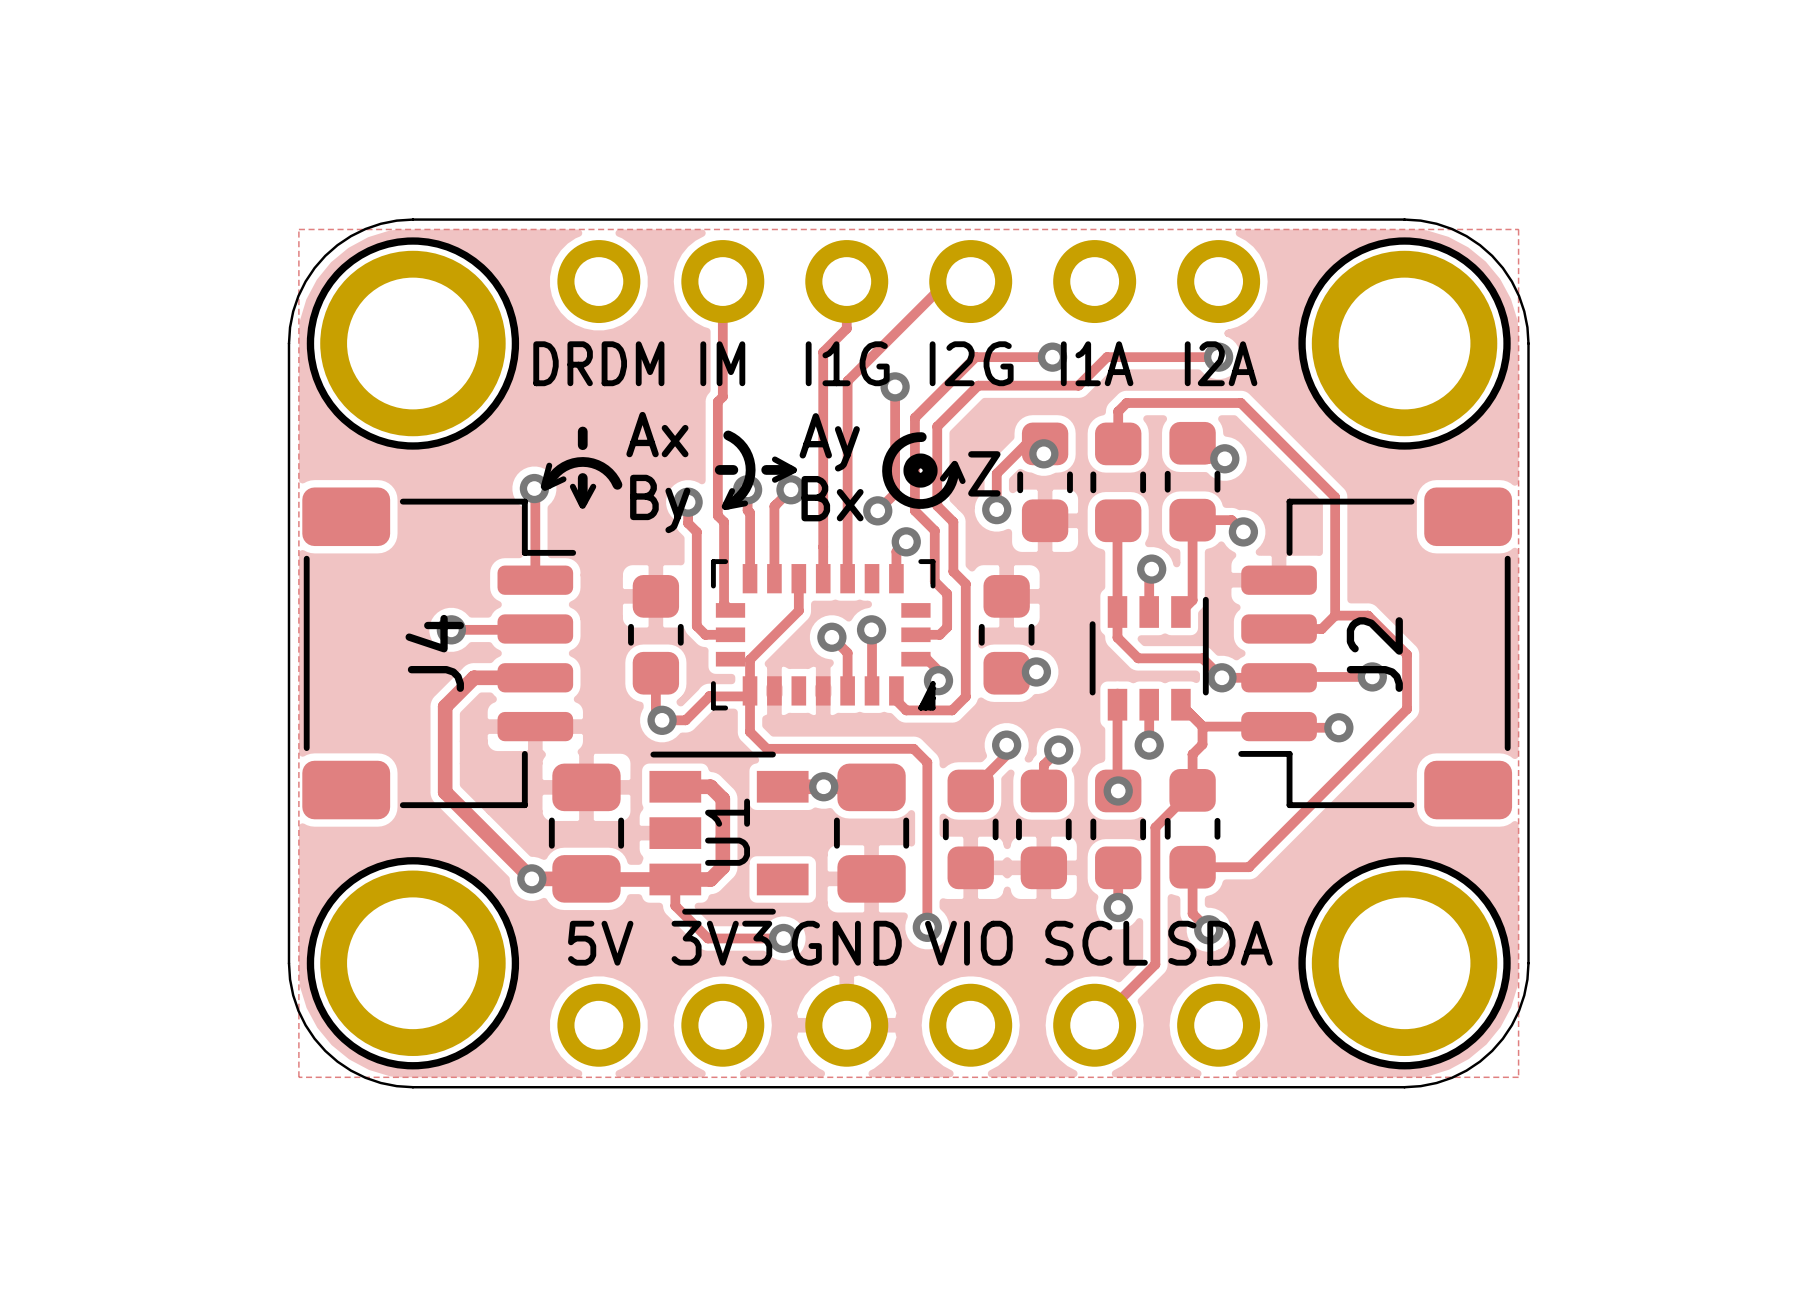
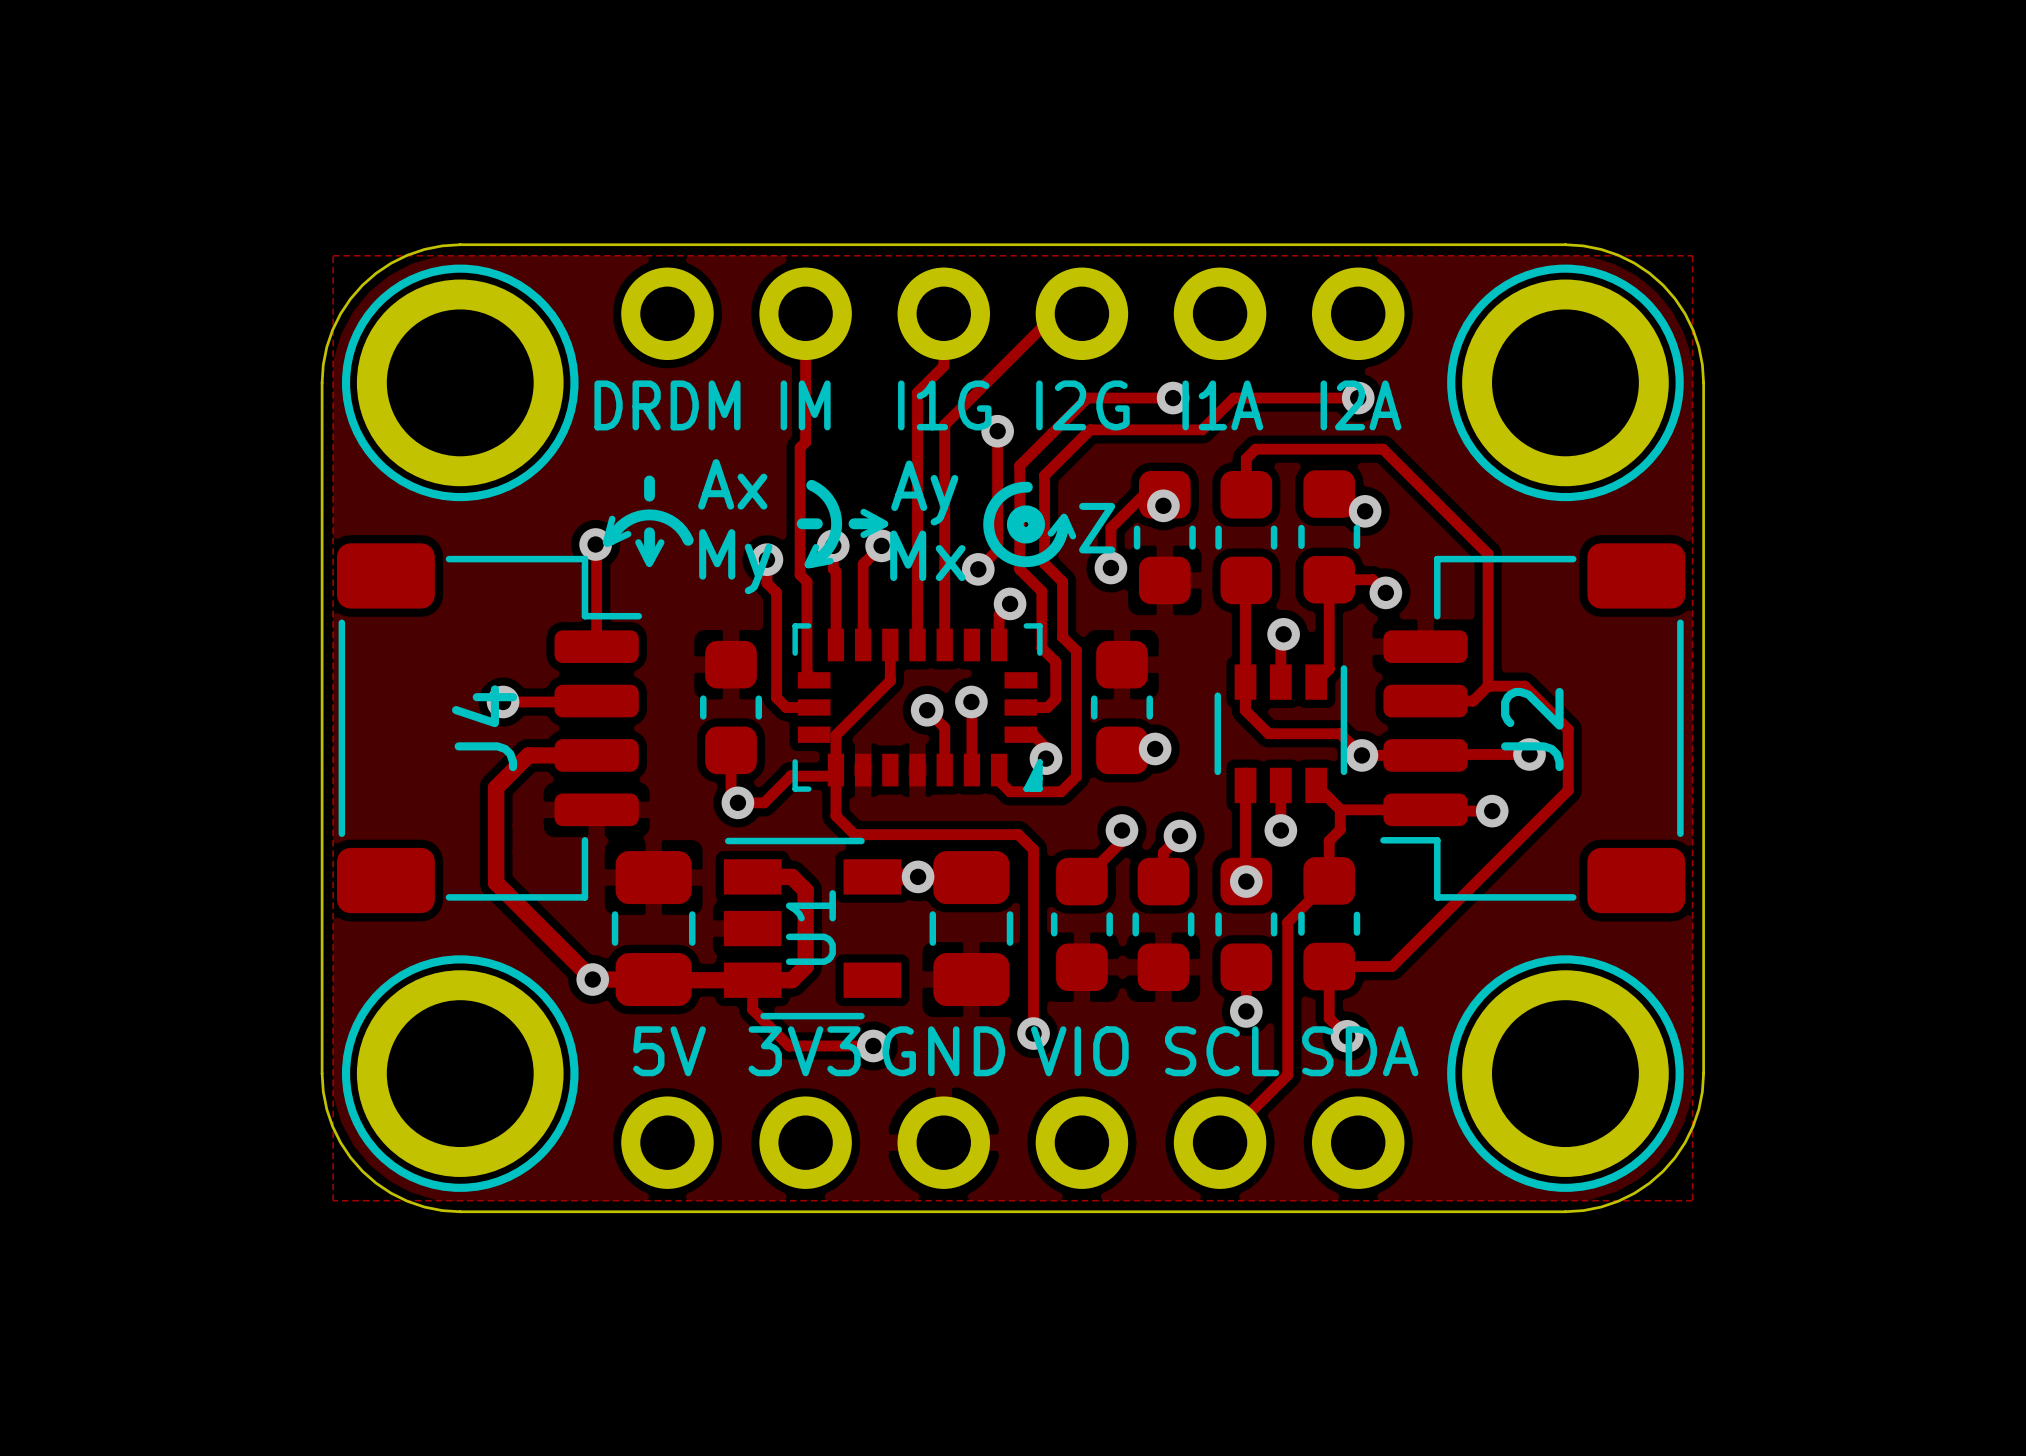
text: Bx (832, 498) -> Mx (927, 555)
text: By (660, 503) -> My (735, 561)

